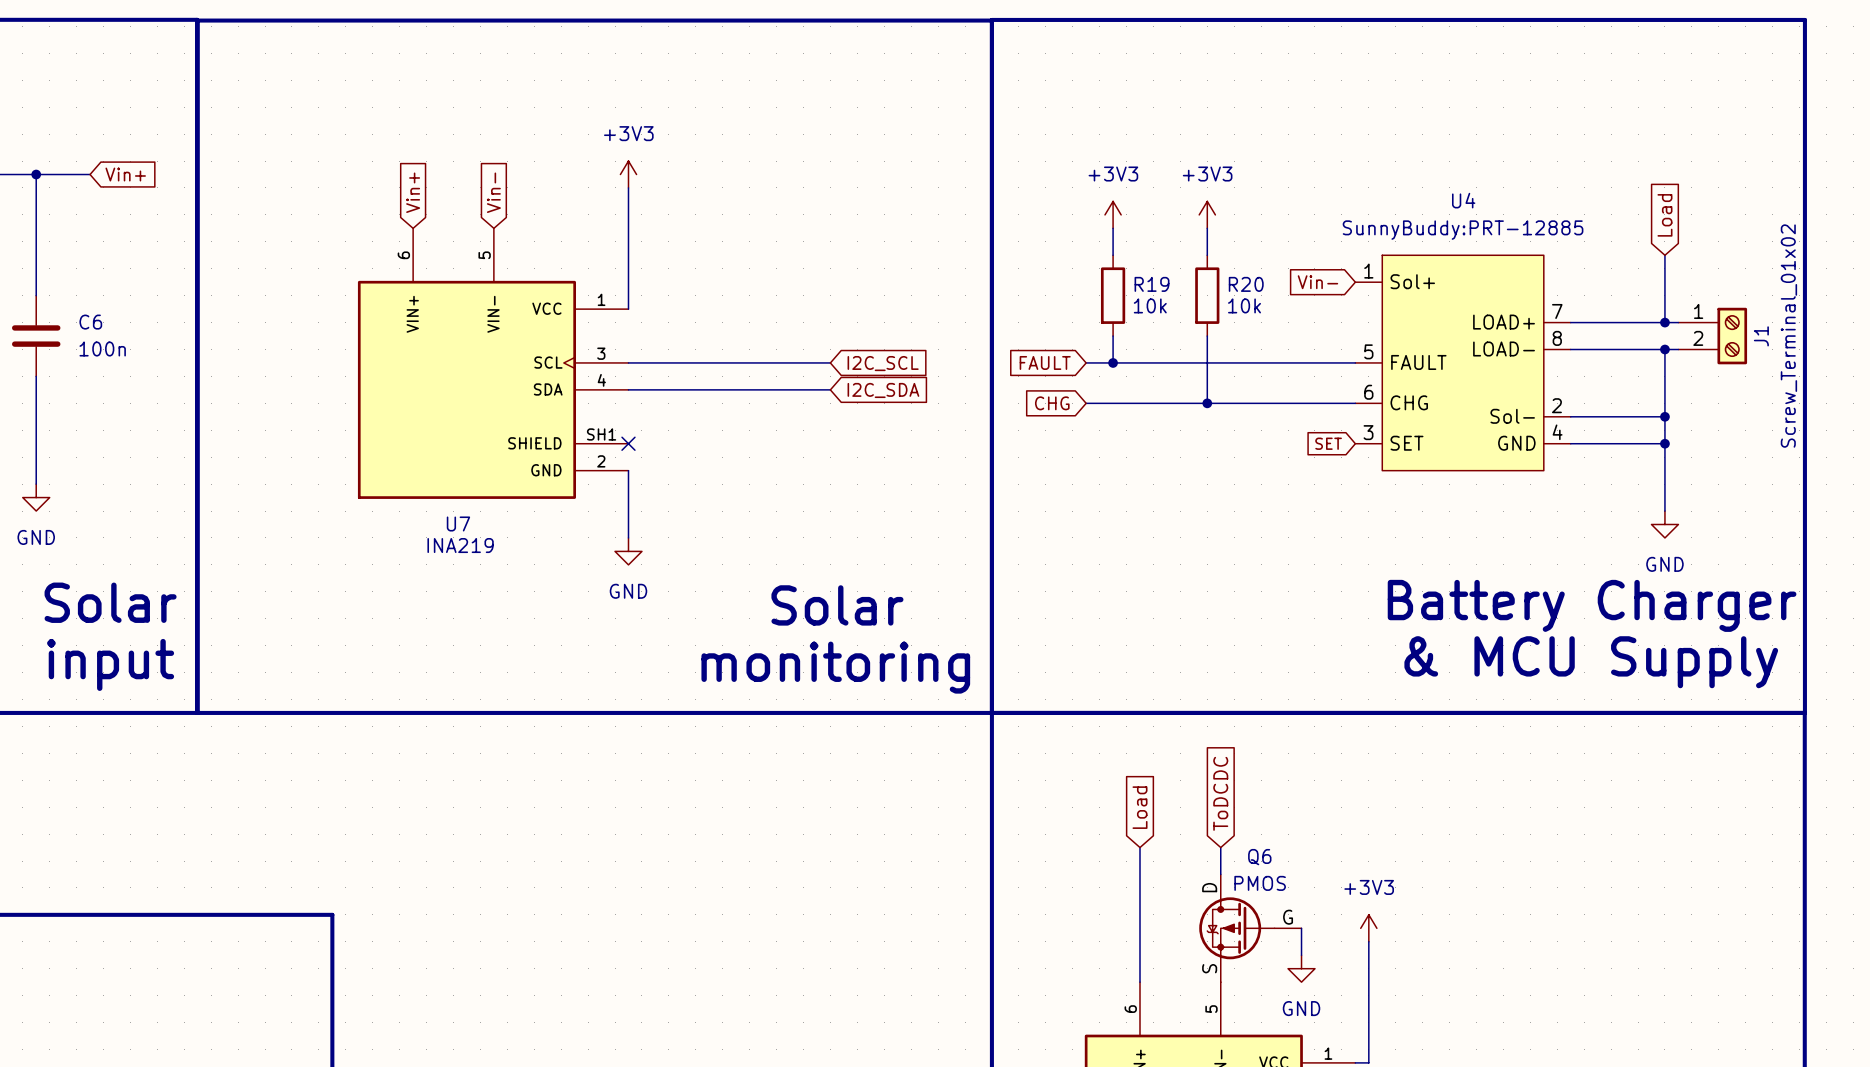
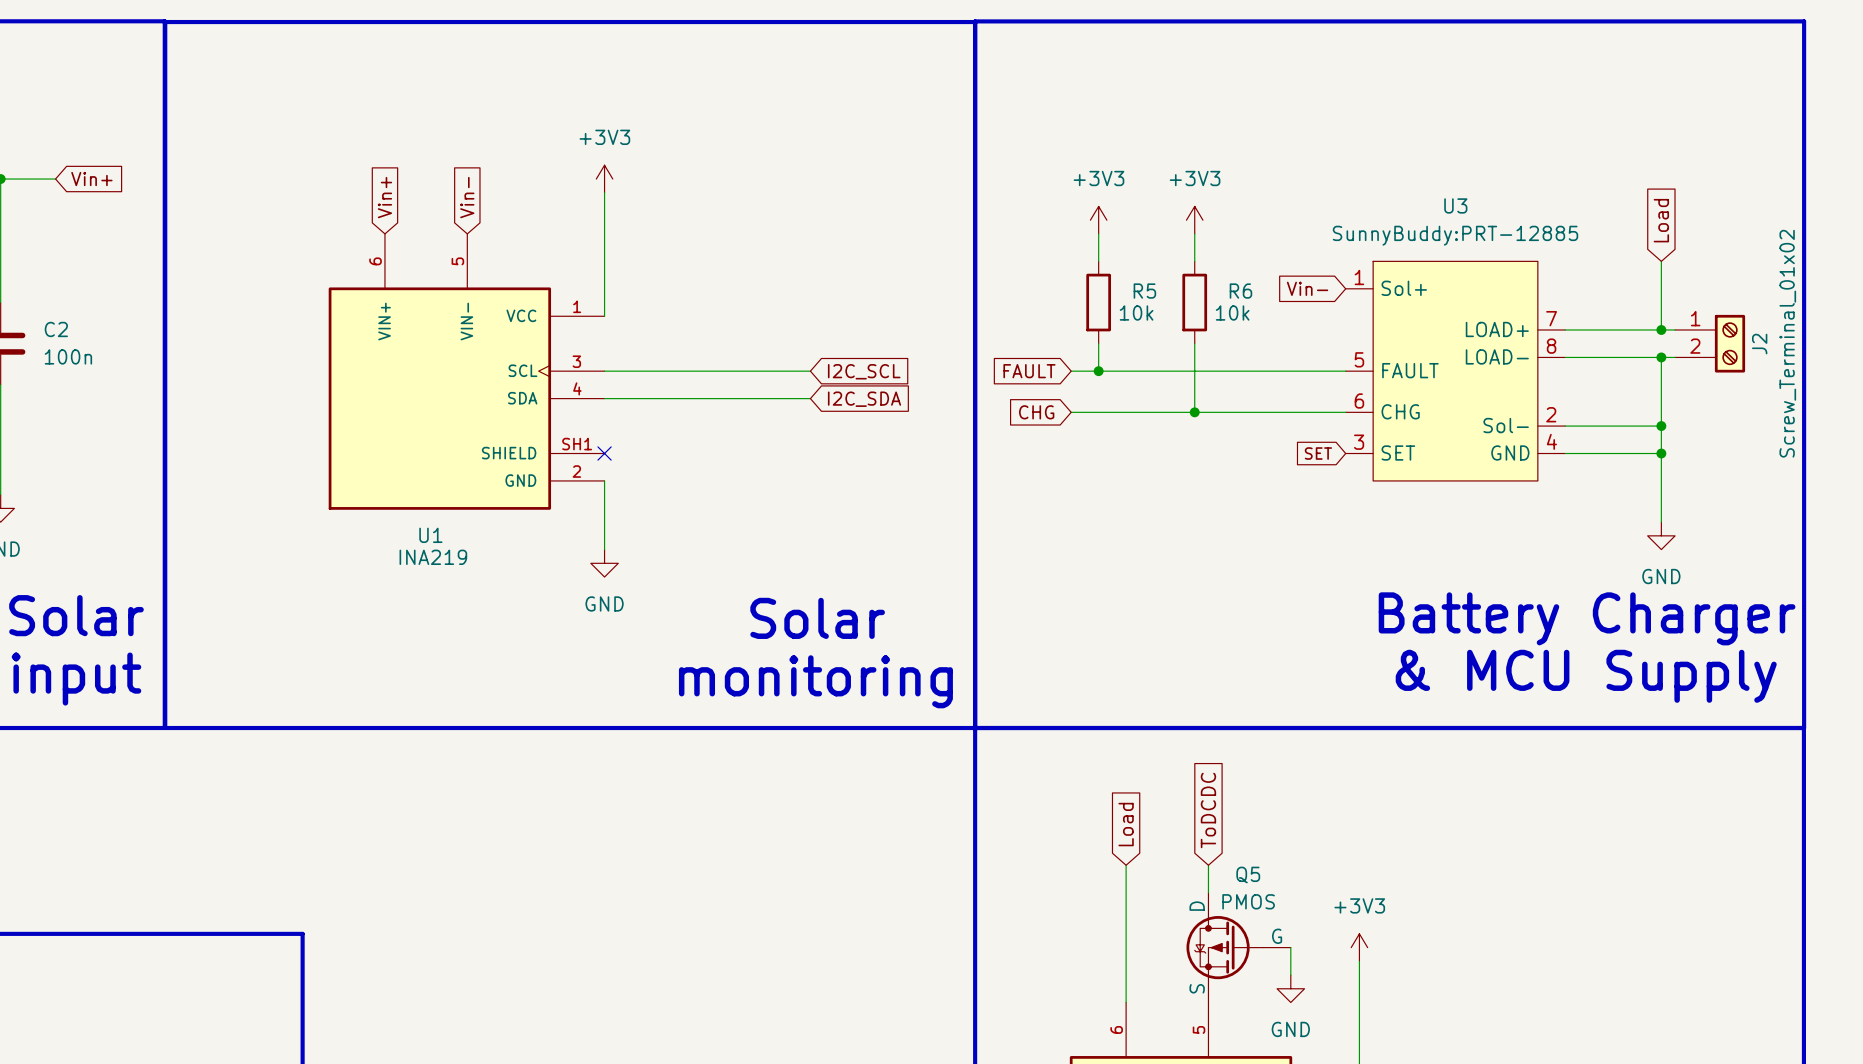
U4 name: U4 (1463, 200) -> U3 (1455, 205)
R19 name: R19 (1152, 284) -> R5 (1144, 291)
R20 name: R20 (1246, 284) -> R6 (1240, 291)
C6 name: C6 (90, 322) -> C2 (56, 329)
J1 name: J1 (1761, 336) -> J2 (1759, 344)
U7 name: U7 (458, 523) -> U1 (430, 535)
Q6 name: Q6 (1259, 857) -> Q5 (1248, 875)

